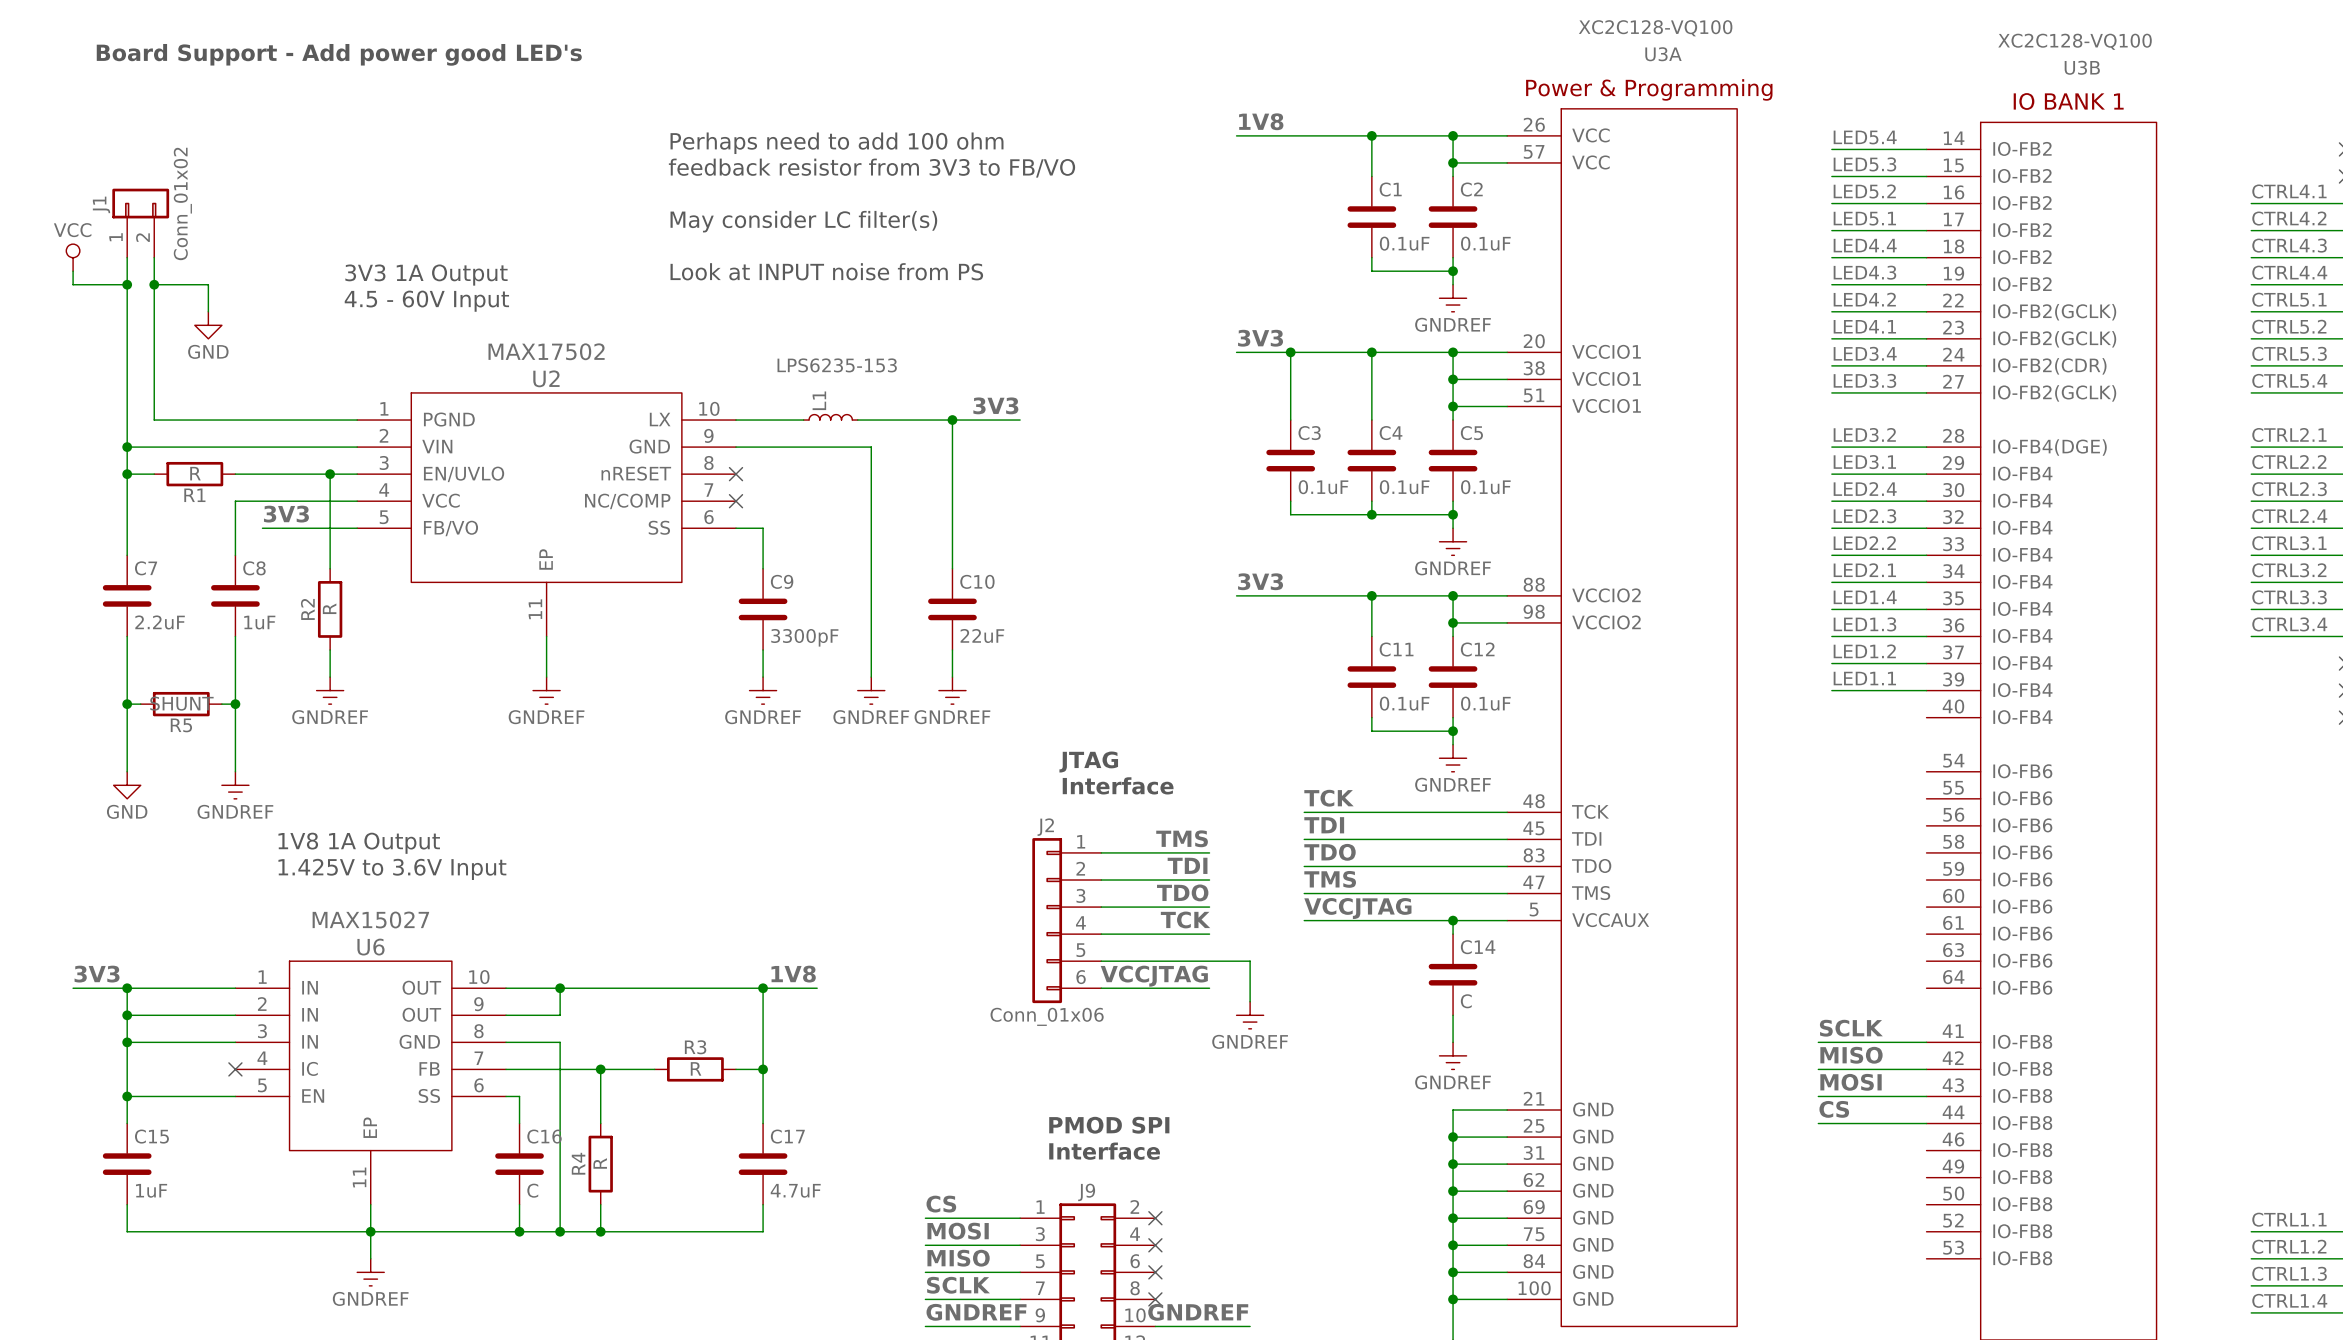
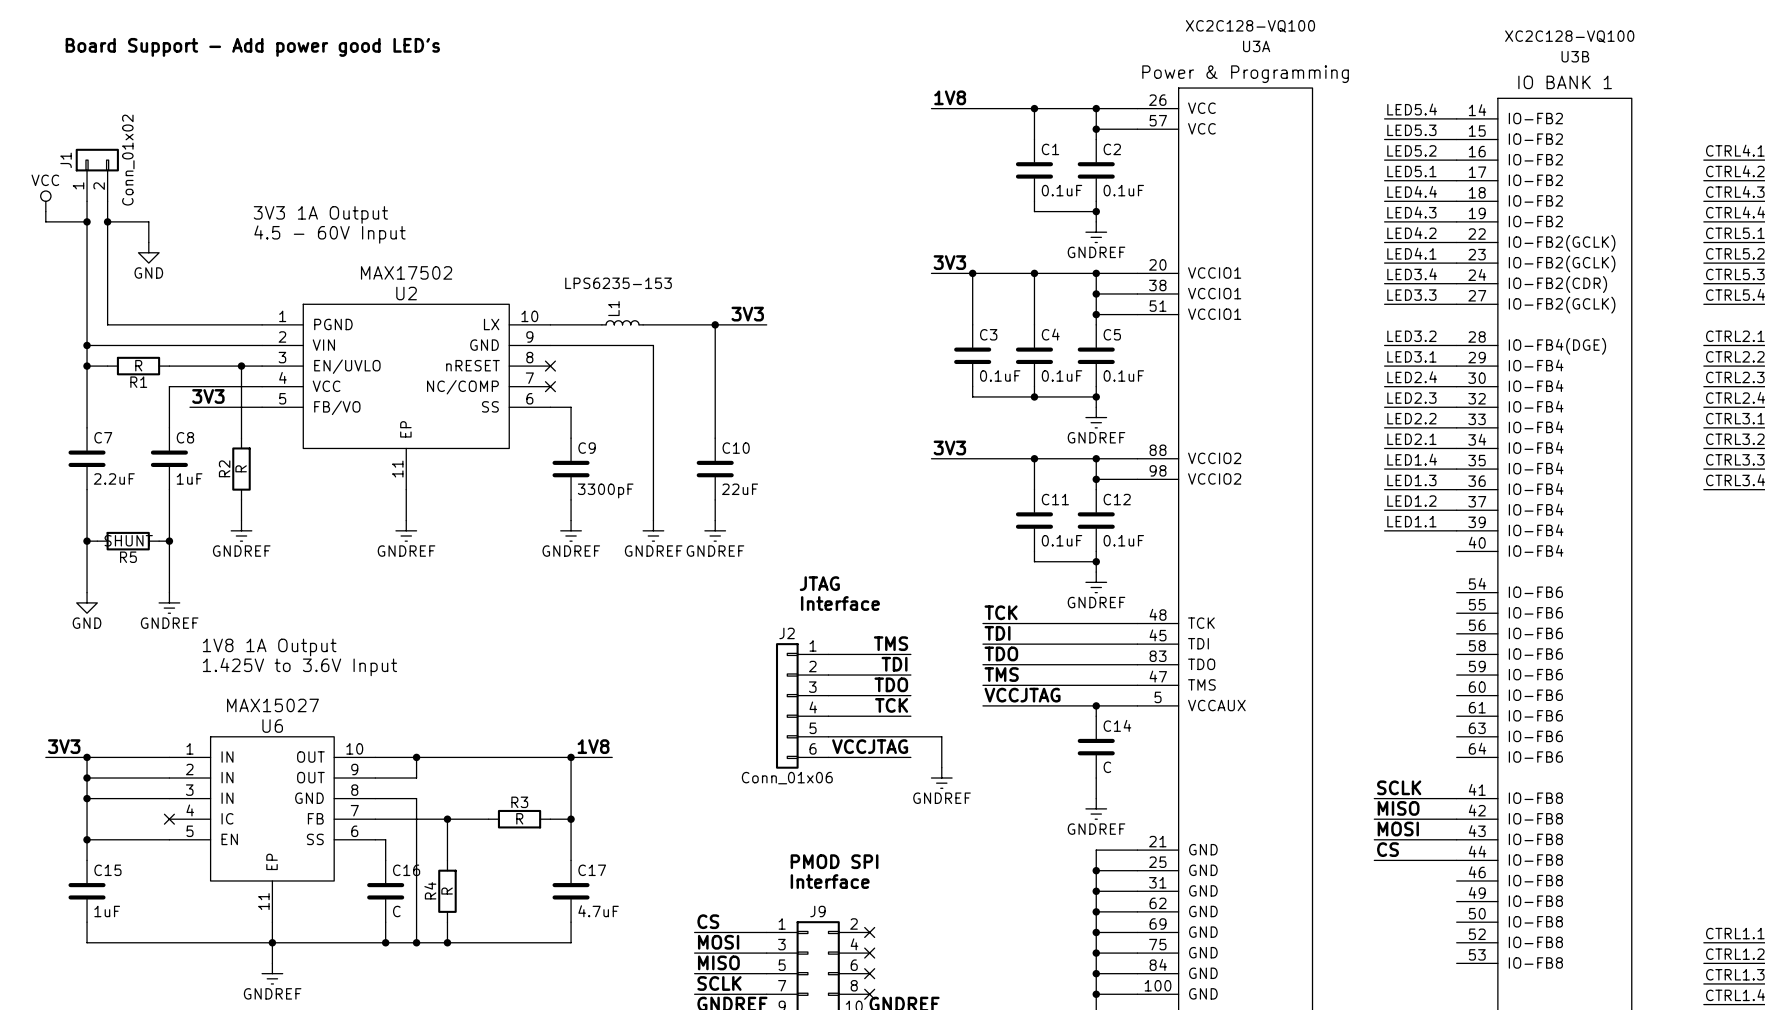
text: Perhaps need to add 100 ohm (837, 143) -> none
text: feedback resistor from 3V3 to FB/VO (871, 168) -> none
text: May consider LC filter(s) (803, 221) -> none
text: Look at INPUT noise from PS (826, 271) -> none

